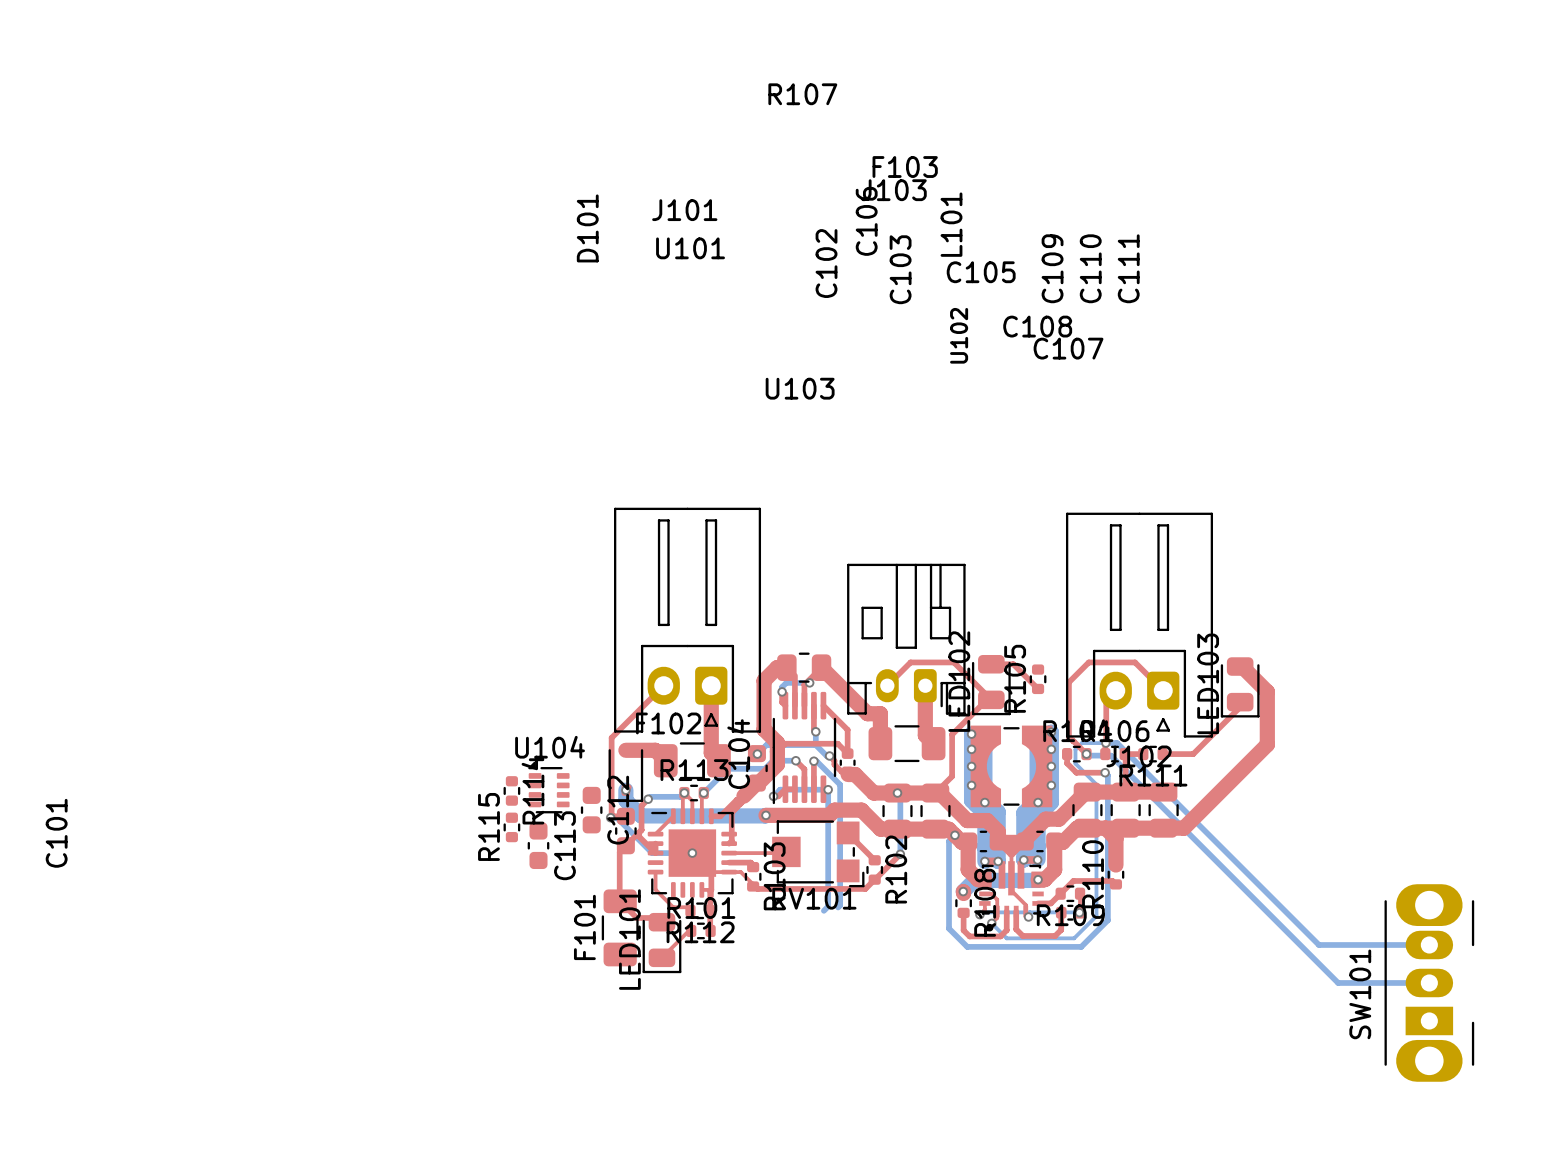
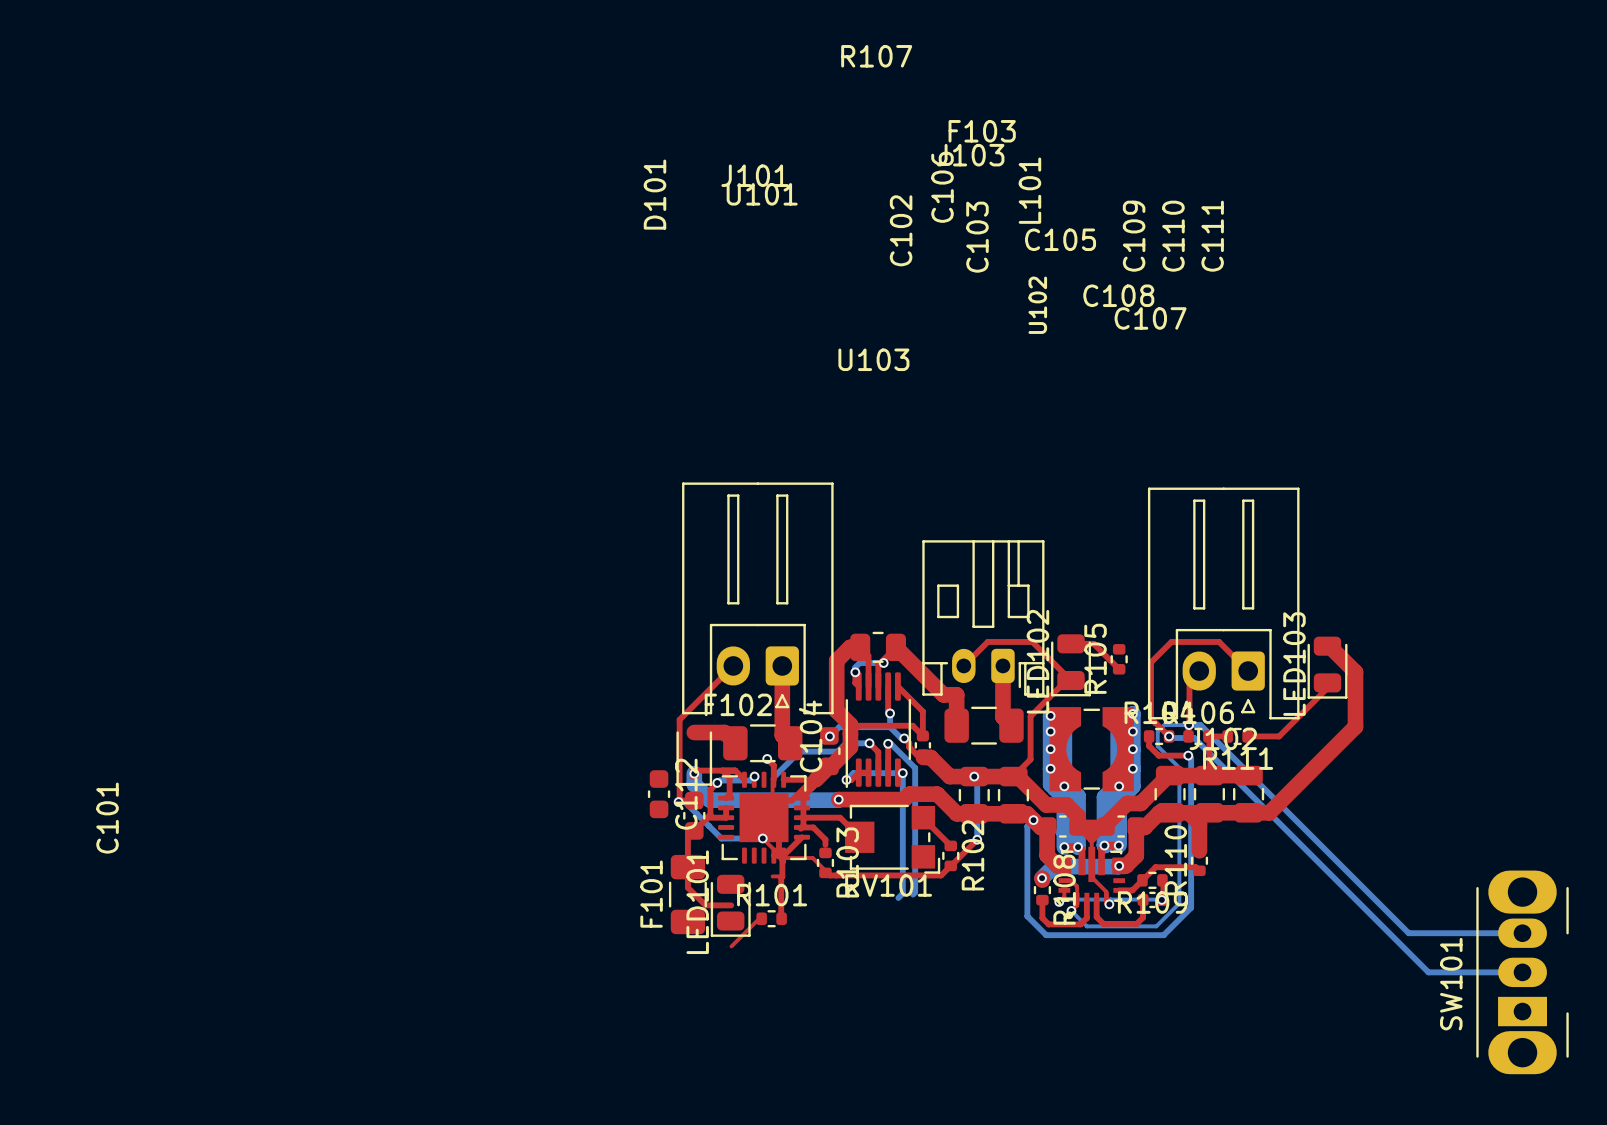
top track: none -> (767, 758) (773, 765) (773, 779)
U104: (548, 787) -> none
top track: none -> (697, 770) (735, 770) (744, 779)
top track: none -> (722, 770) (729, 777) (729, 794) (726, 798)
R114: (511, 790) -> none
R113: (694, 793) -> none
via position: (703, 793) -> (767, 758)
top track: none -> (783, 779) (815, 779)
top track: (673, 816) (655, 834) -> (801, 837) (783, 855)
top track: (682, 816) (684, 793) (692, 801) (692, 816) -> none
R115: (511, 827) -> none
top track: (639, 832) (639, 836) (655, 853) (655, 843) -> (707, 817) (726, 817) (726, 807)
top track: none -> (801, 817) (840, 817) (857, 835)
top track: none -> (801, 827) (813, 827) (825, 839) (825, 844)
C113: (538, 845) -> none
top track: (786, 851) (729, 853) -> none
U101 position: (692, 853) -> (764, 817)
top track: (729, 862) (750, 862) (753, 865) -> none
top track: (655, 872) (655, 889) (673, 907) (686, 907) (690, 910) -> none
R112: (700, 910) -> none
F101 position: (620, 927) -> (687, 894)
LED101 position: (661, 943) -> (730, 905)

